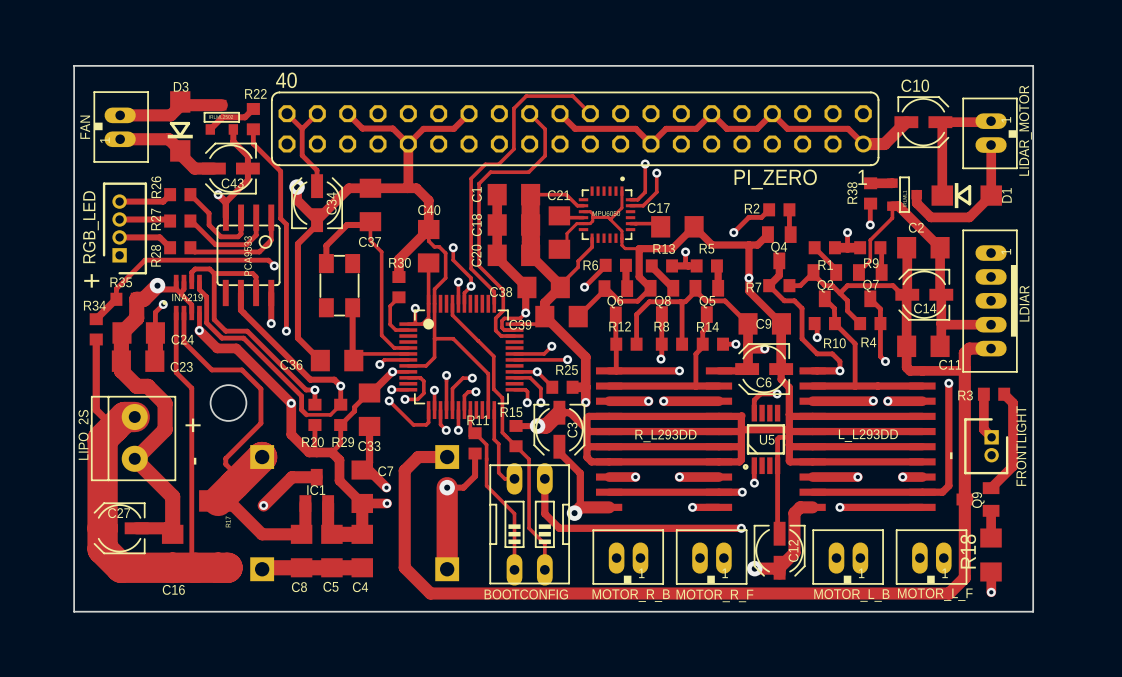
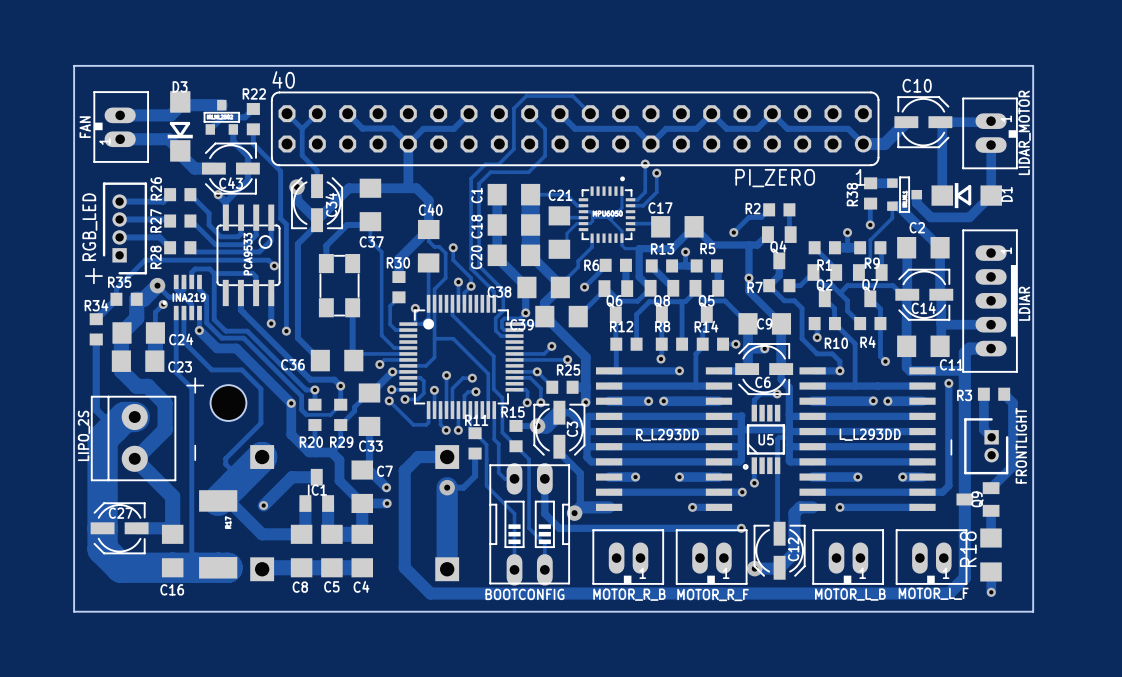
track: none -> (157, 285) (169, 297) (176, 297) (180, 293)
track: (159, 289) (176, 289) -> none

